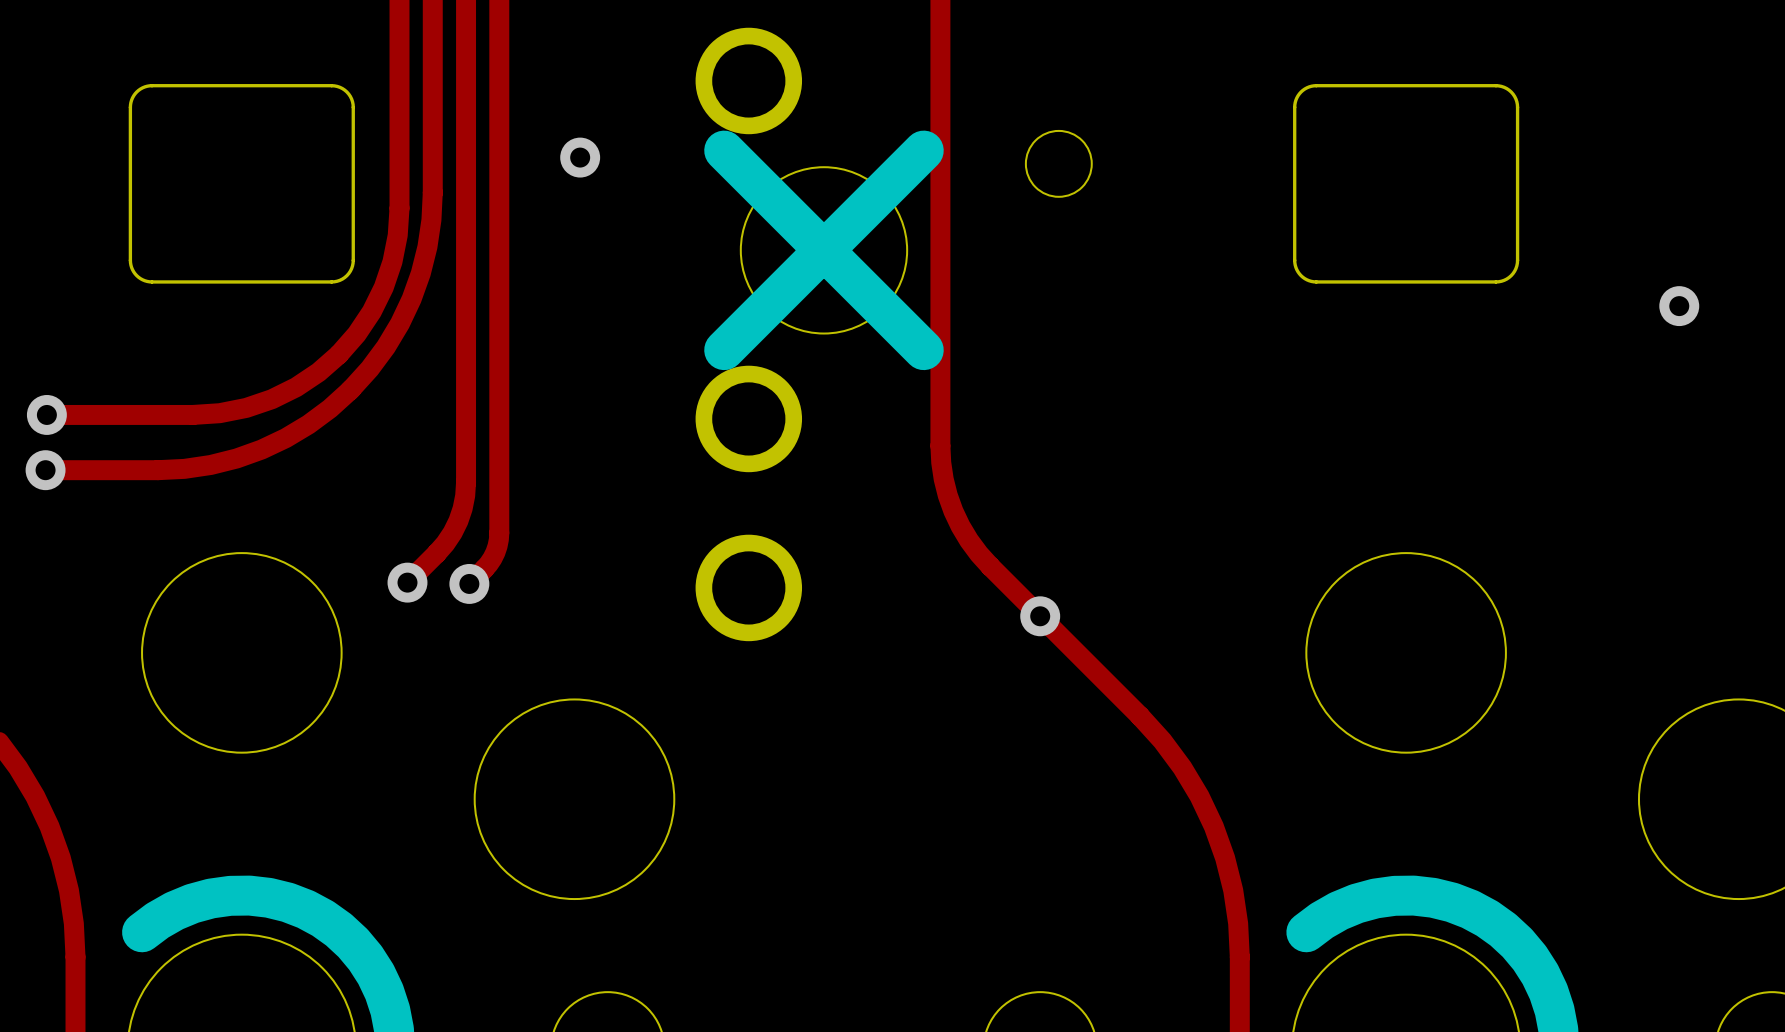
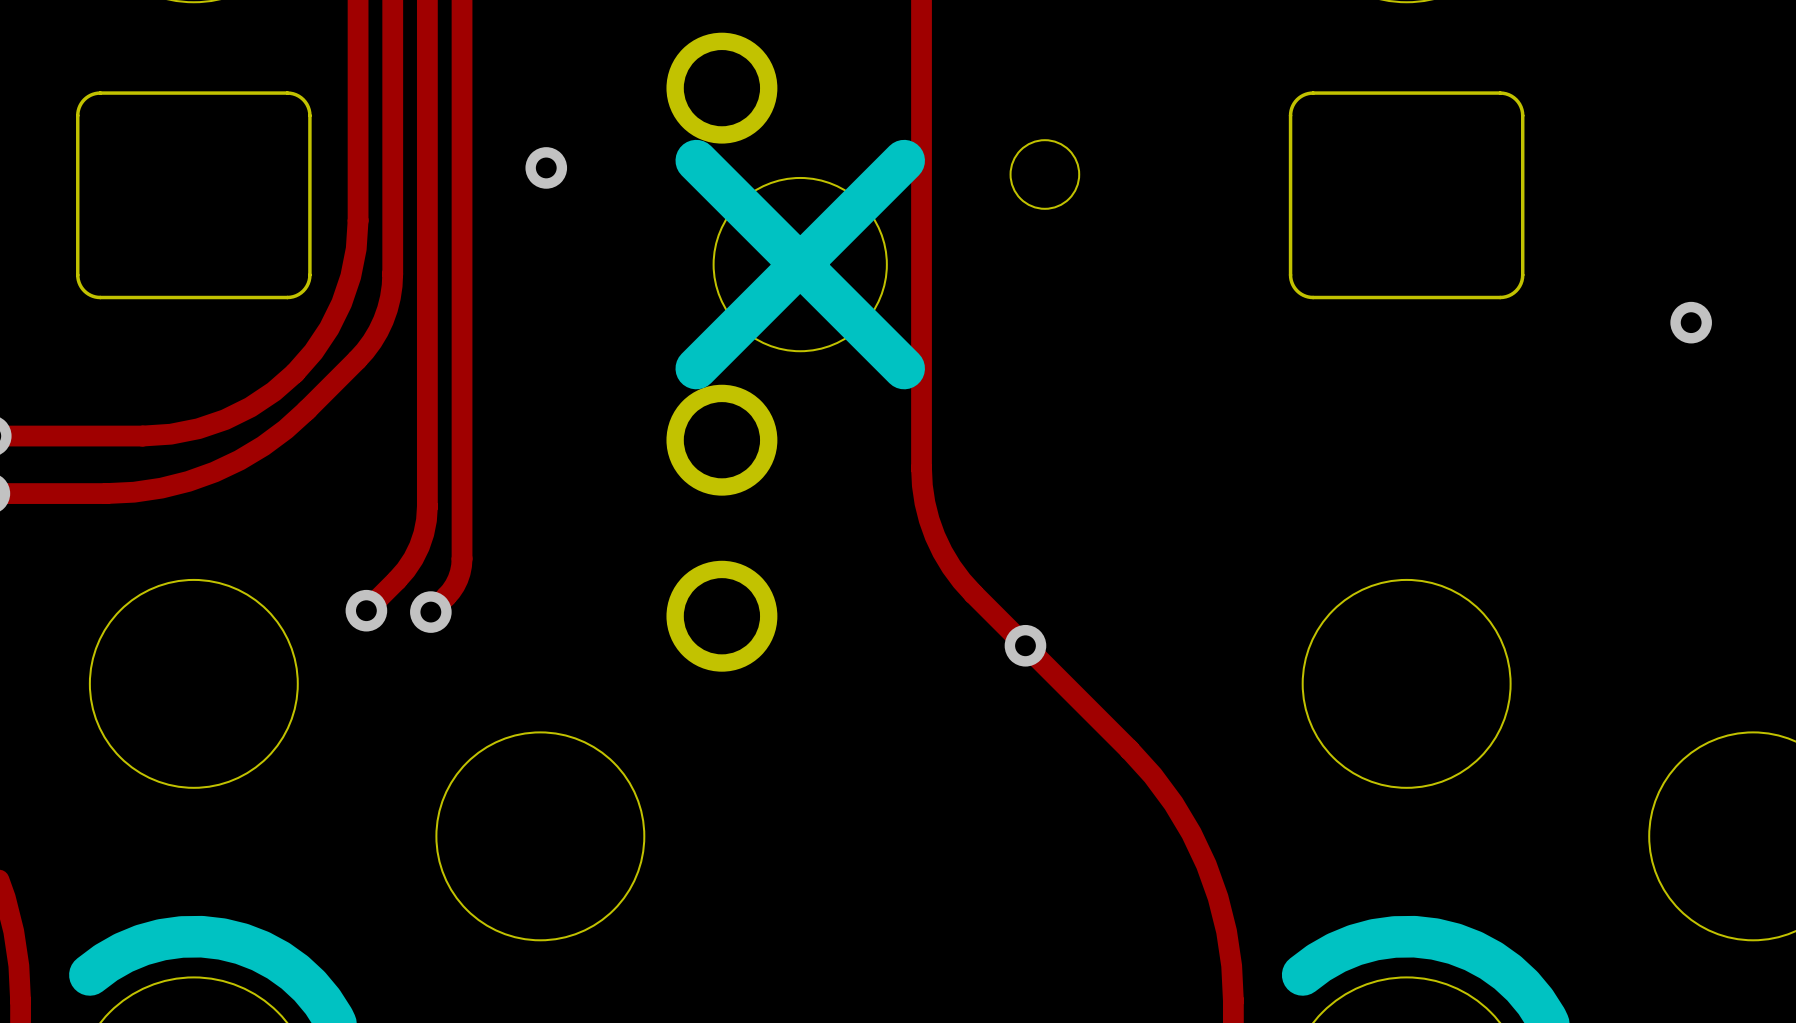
track: (432, 192) (427, 246) (411, 298) (386, 346) (351, 388) -> (392, 204) (392, 285) (383, 320) (365, 351) (308, 408)

